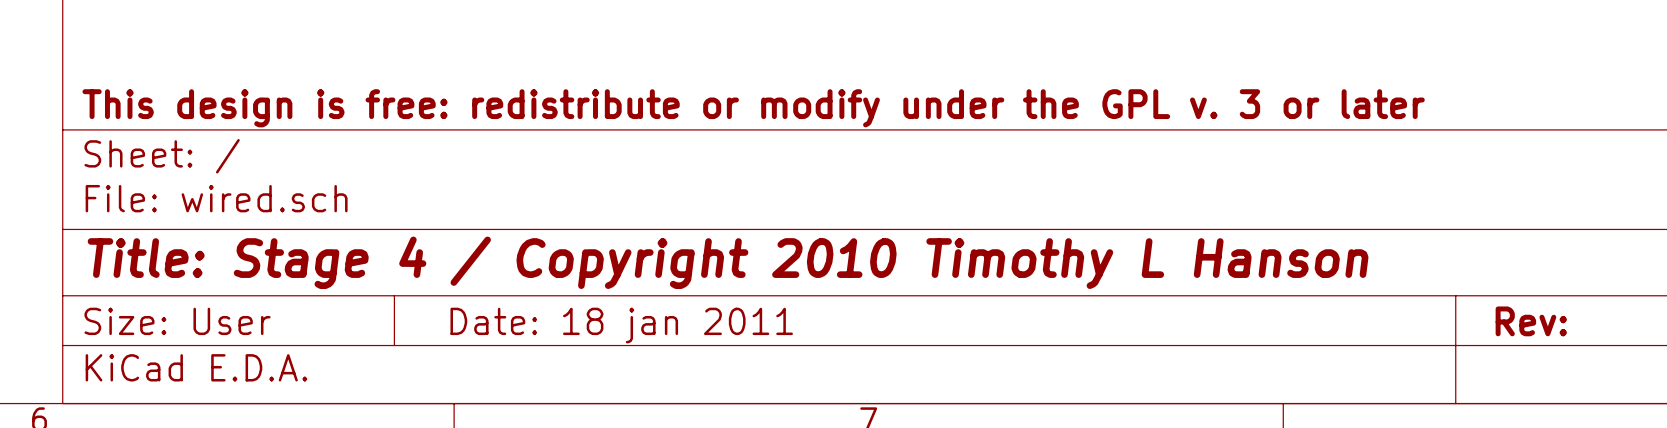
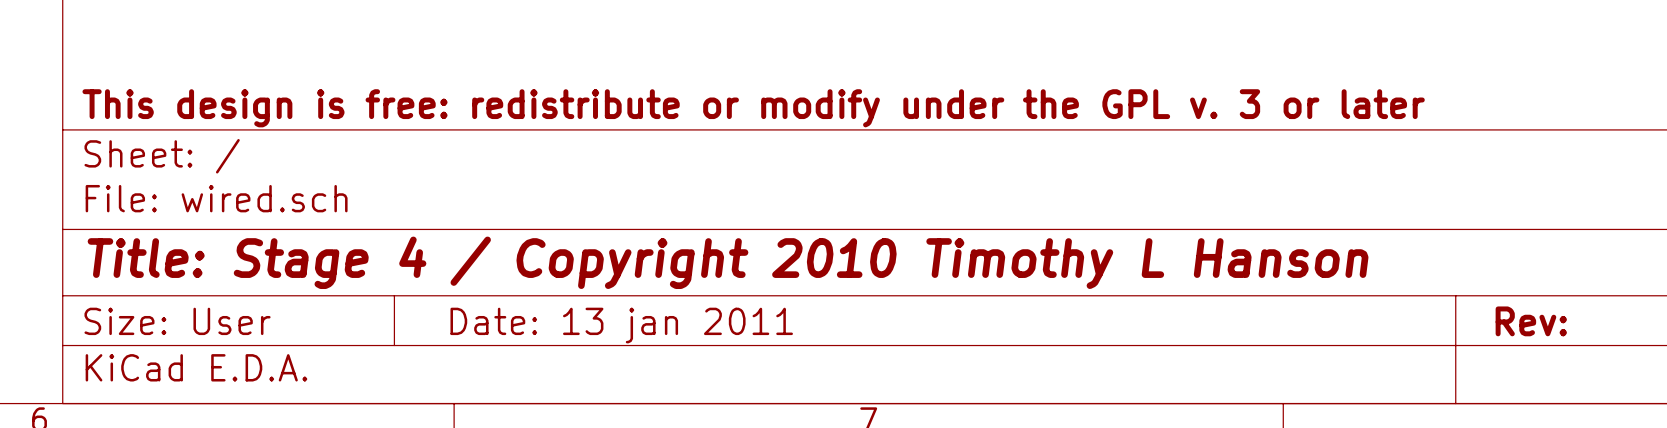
title block: Date: 18 jan 2011 (621, 325) -> Date: 13 jan 2011 (621, 325)

